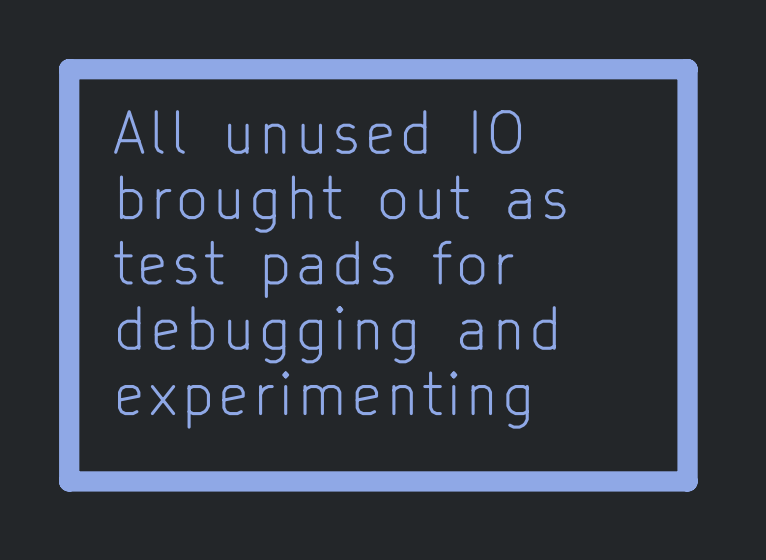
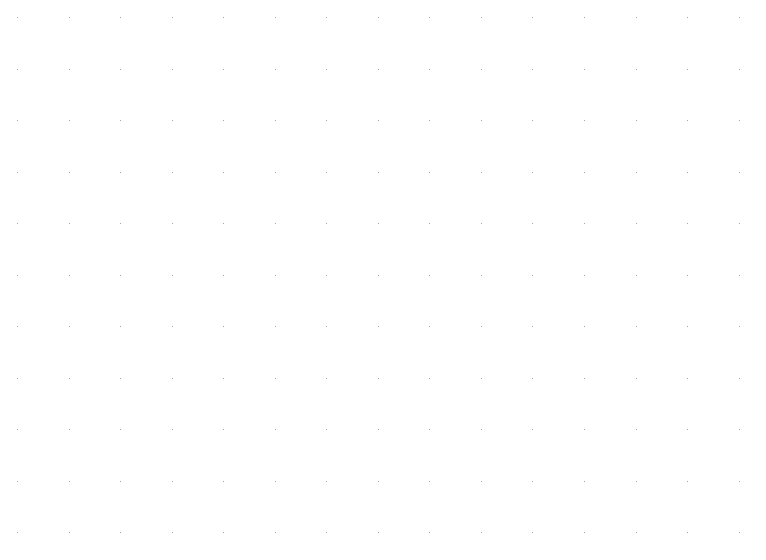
line: (69, 69) (687, 69) (687, 481) (69, 481) (69, 69) -> none
text: All unused IO (317, 131) -> none
text: brought out as (342, 204) -> none
text: test pads for (313, 269) -> none
text: debugging and (336, 334) -> none
text: experimenting (323, 400) -> none

